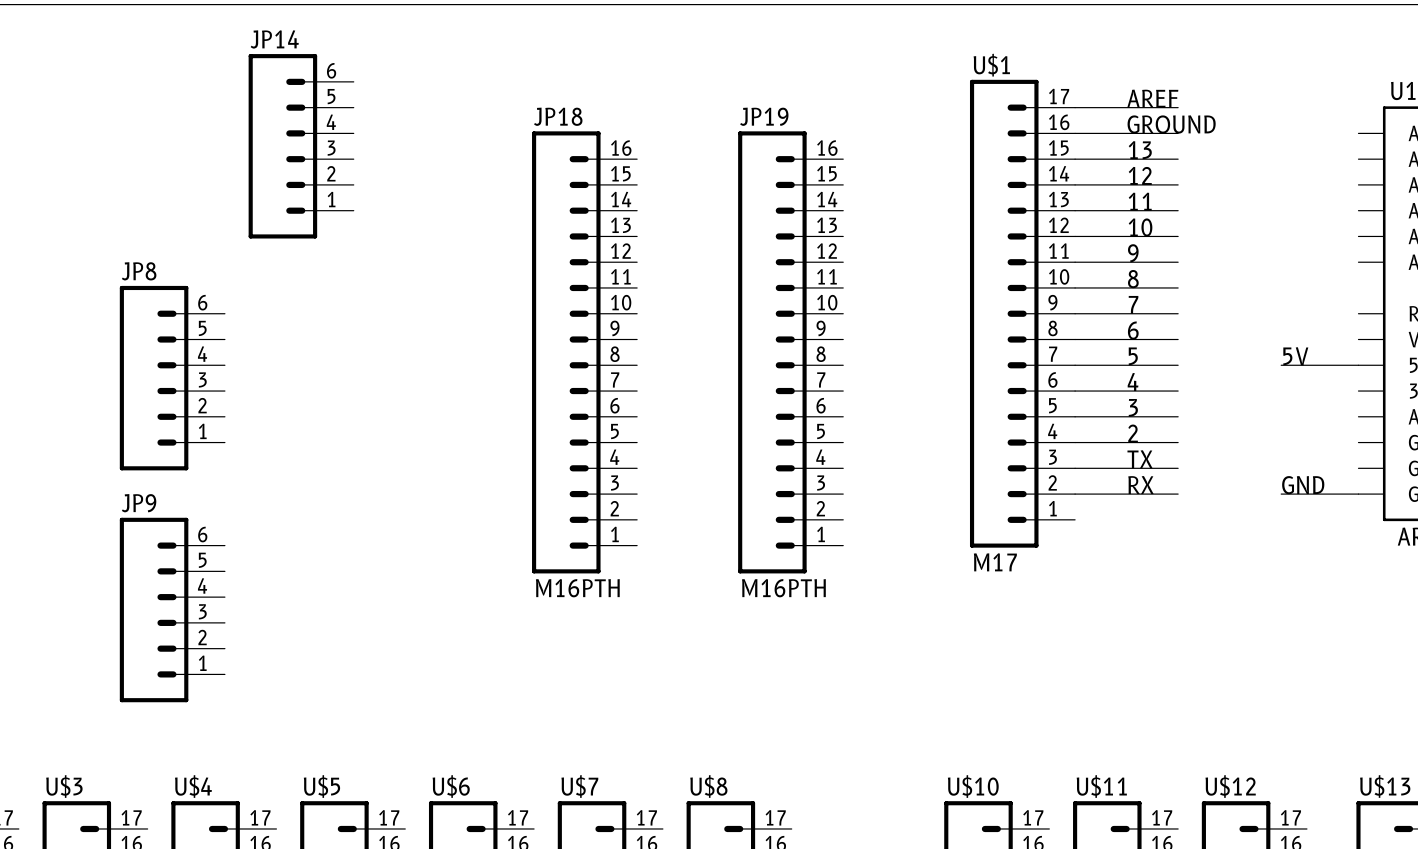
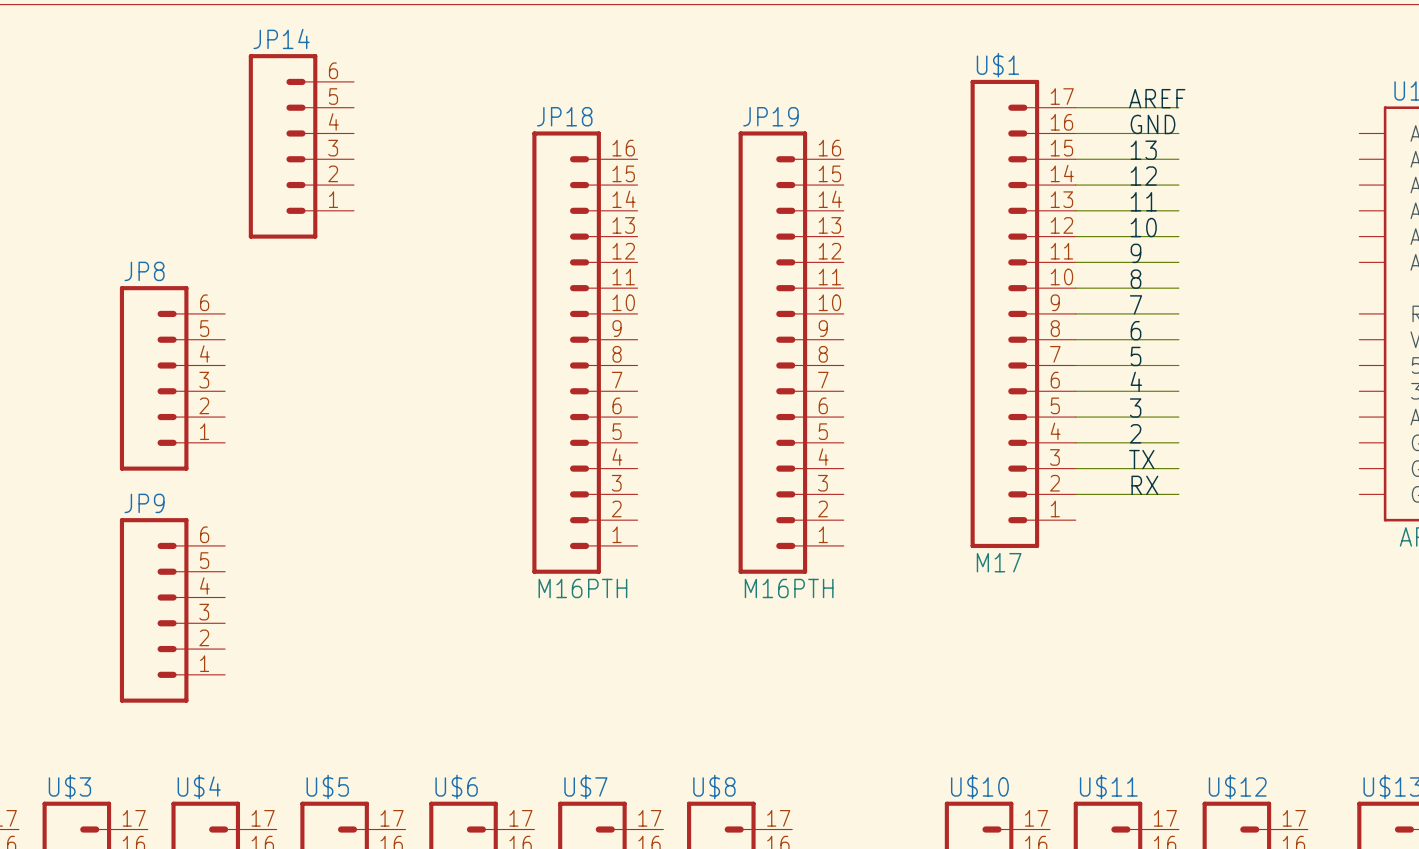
label: GROUND (1171, 124) -> GND (1153, 124)
label: 5V (1295, 356) -> none
wire: (1281, 365) (1358, 365) -> none
label: GND (1303, 485) -> none
wire: (1281, 494) (1358, 494) -> none

